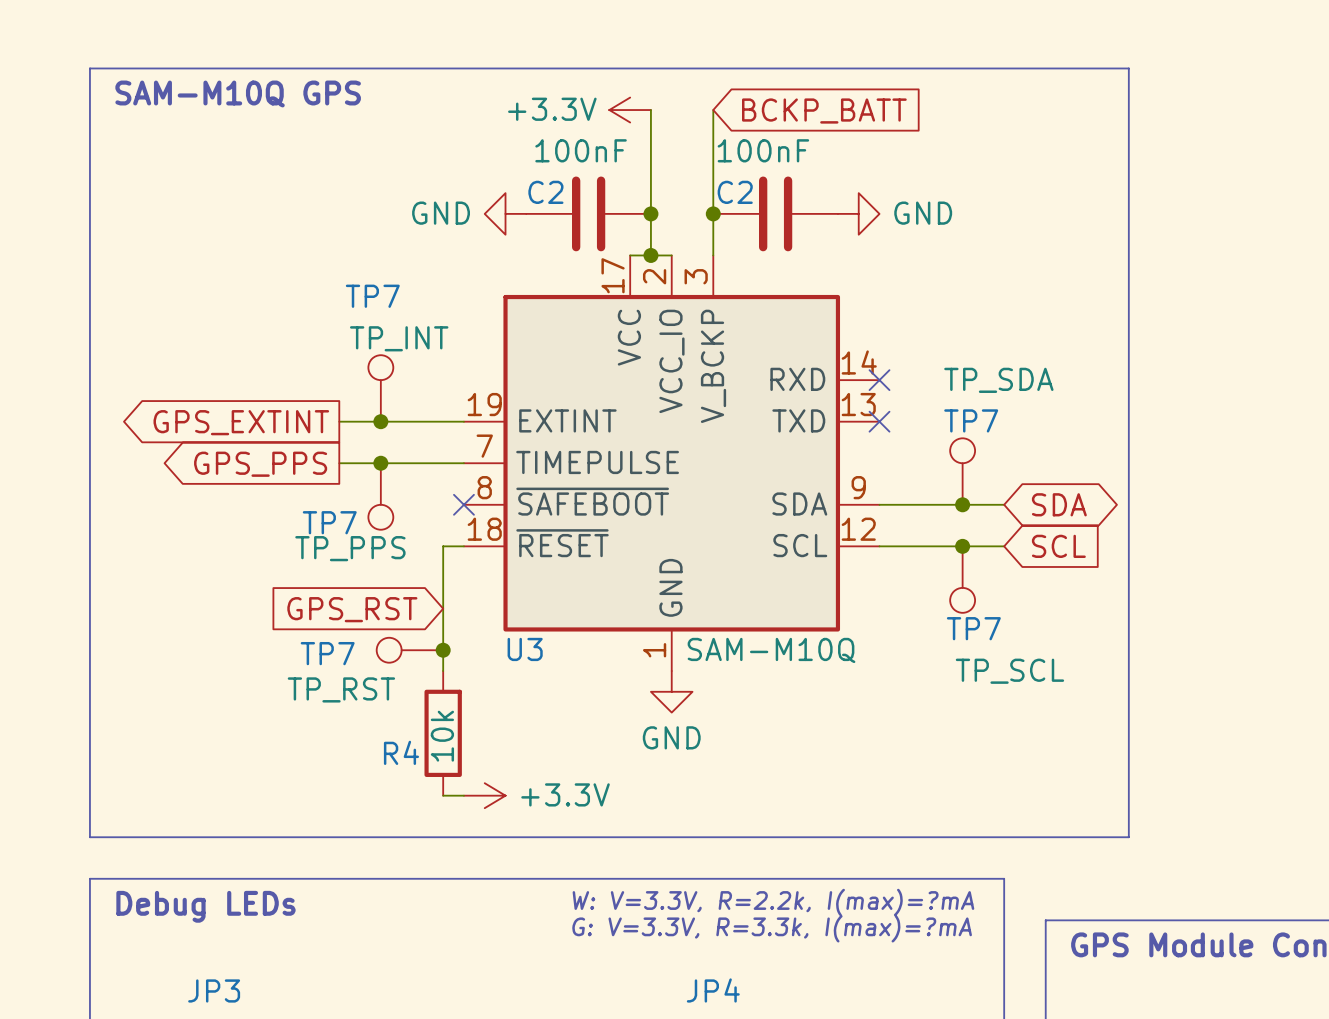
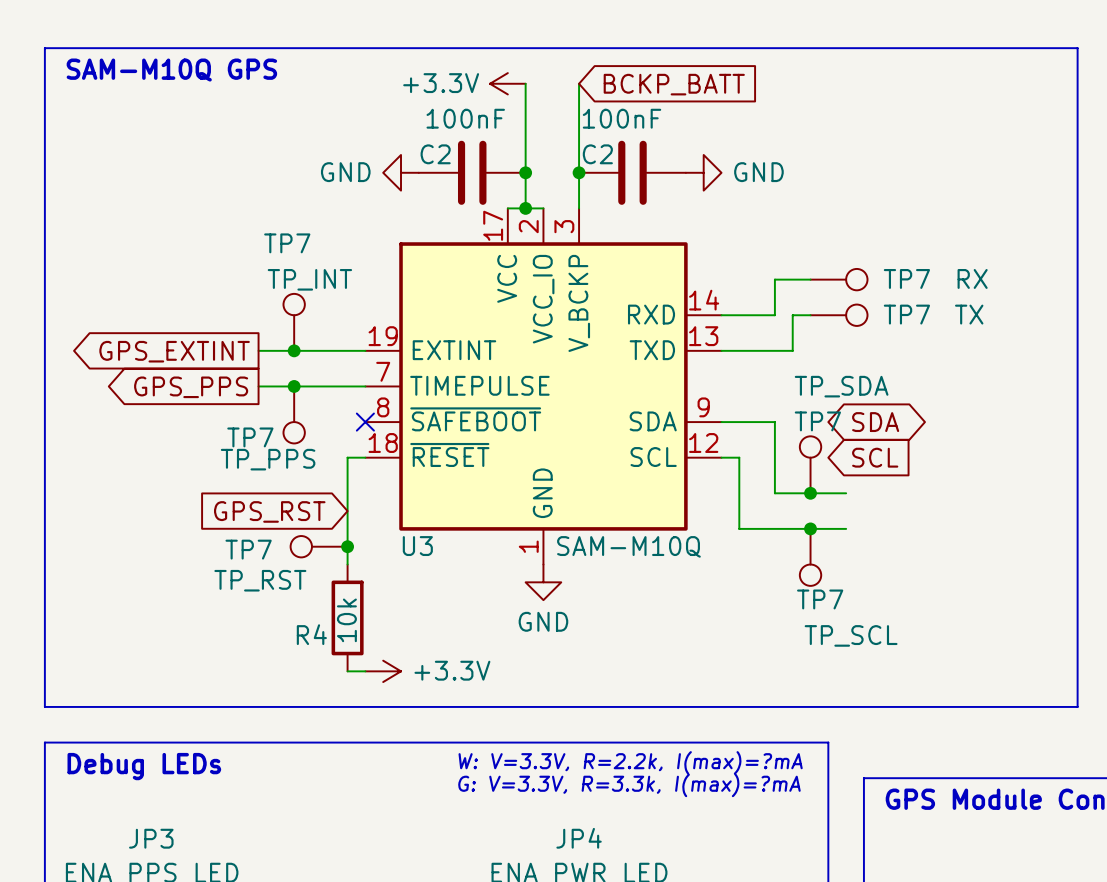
line: (1128, 68) (1128, 837) -> (935, 48) (1077, 48) (1077, 706) (935, 706)
wire: none -> (810, 279) (774, 279) (774, 315) (721, 315)
TP7: none -> RX (839, 279)
no-connect mark: (879, 380) -> none
wire: none -> (810, 315) (792, 315) (792, 350) (721, 350)
TP7: none -> TX (839, 315)
no-connect mark: (879, 421) -> none
TP7 position: (962, 471) -> (810, 464)
wire: (941, 504) (1004, 504) -> (774, 422) (774, 493) (846, 493)
junction: (962, 504) -> none
wire: (900, 546) (1004, 546) -> (739, 457) (739, 528) (846, 528)
junction: (962, 546) -> none
TP7 position: (962, 579) -> (810, 557)
junction: none -> (810, 493)
junction: none -> (810, 528)

